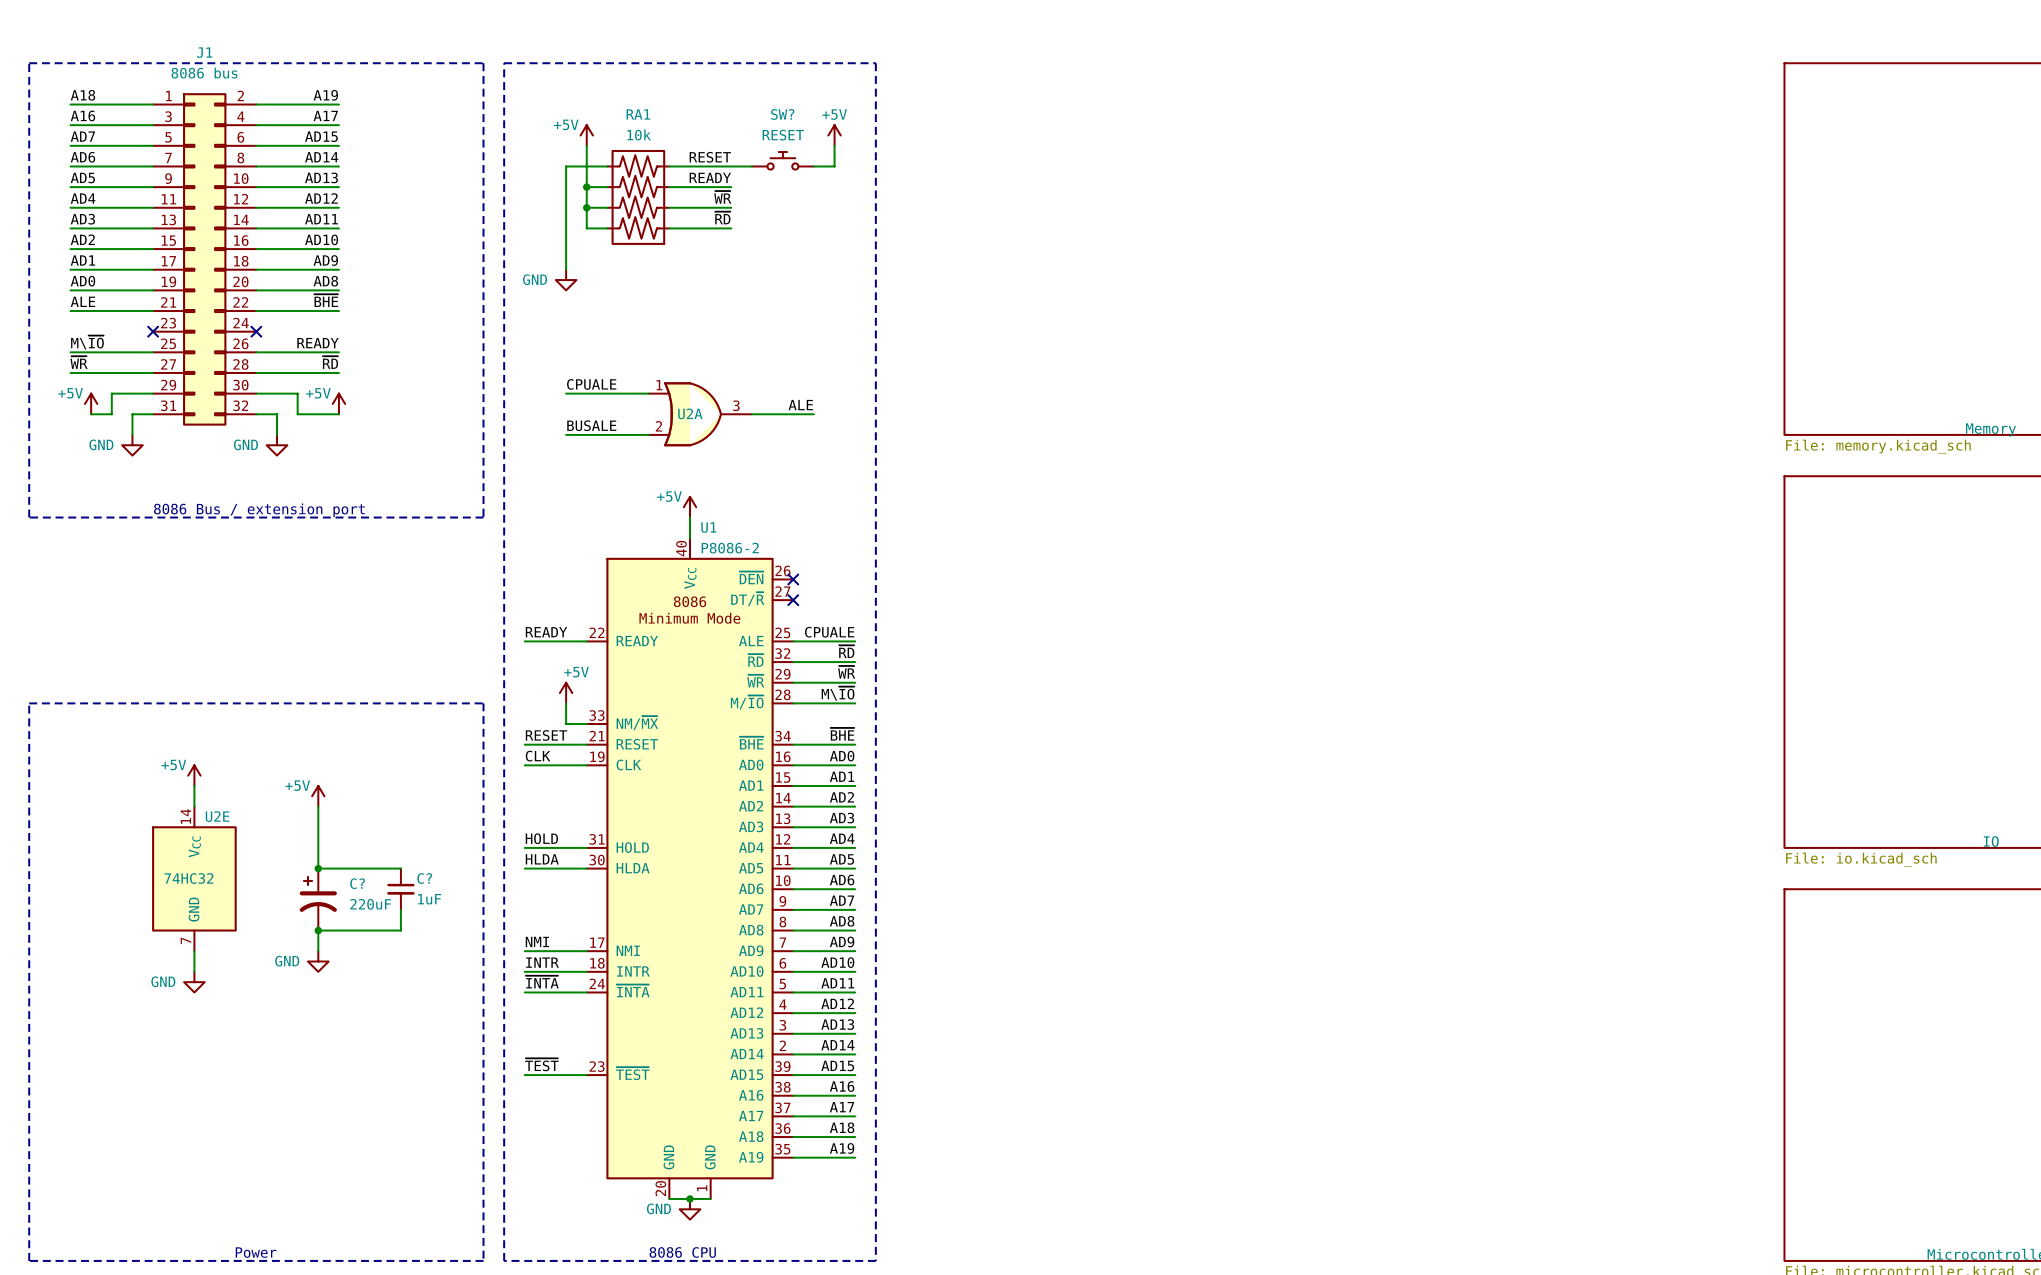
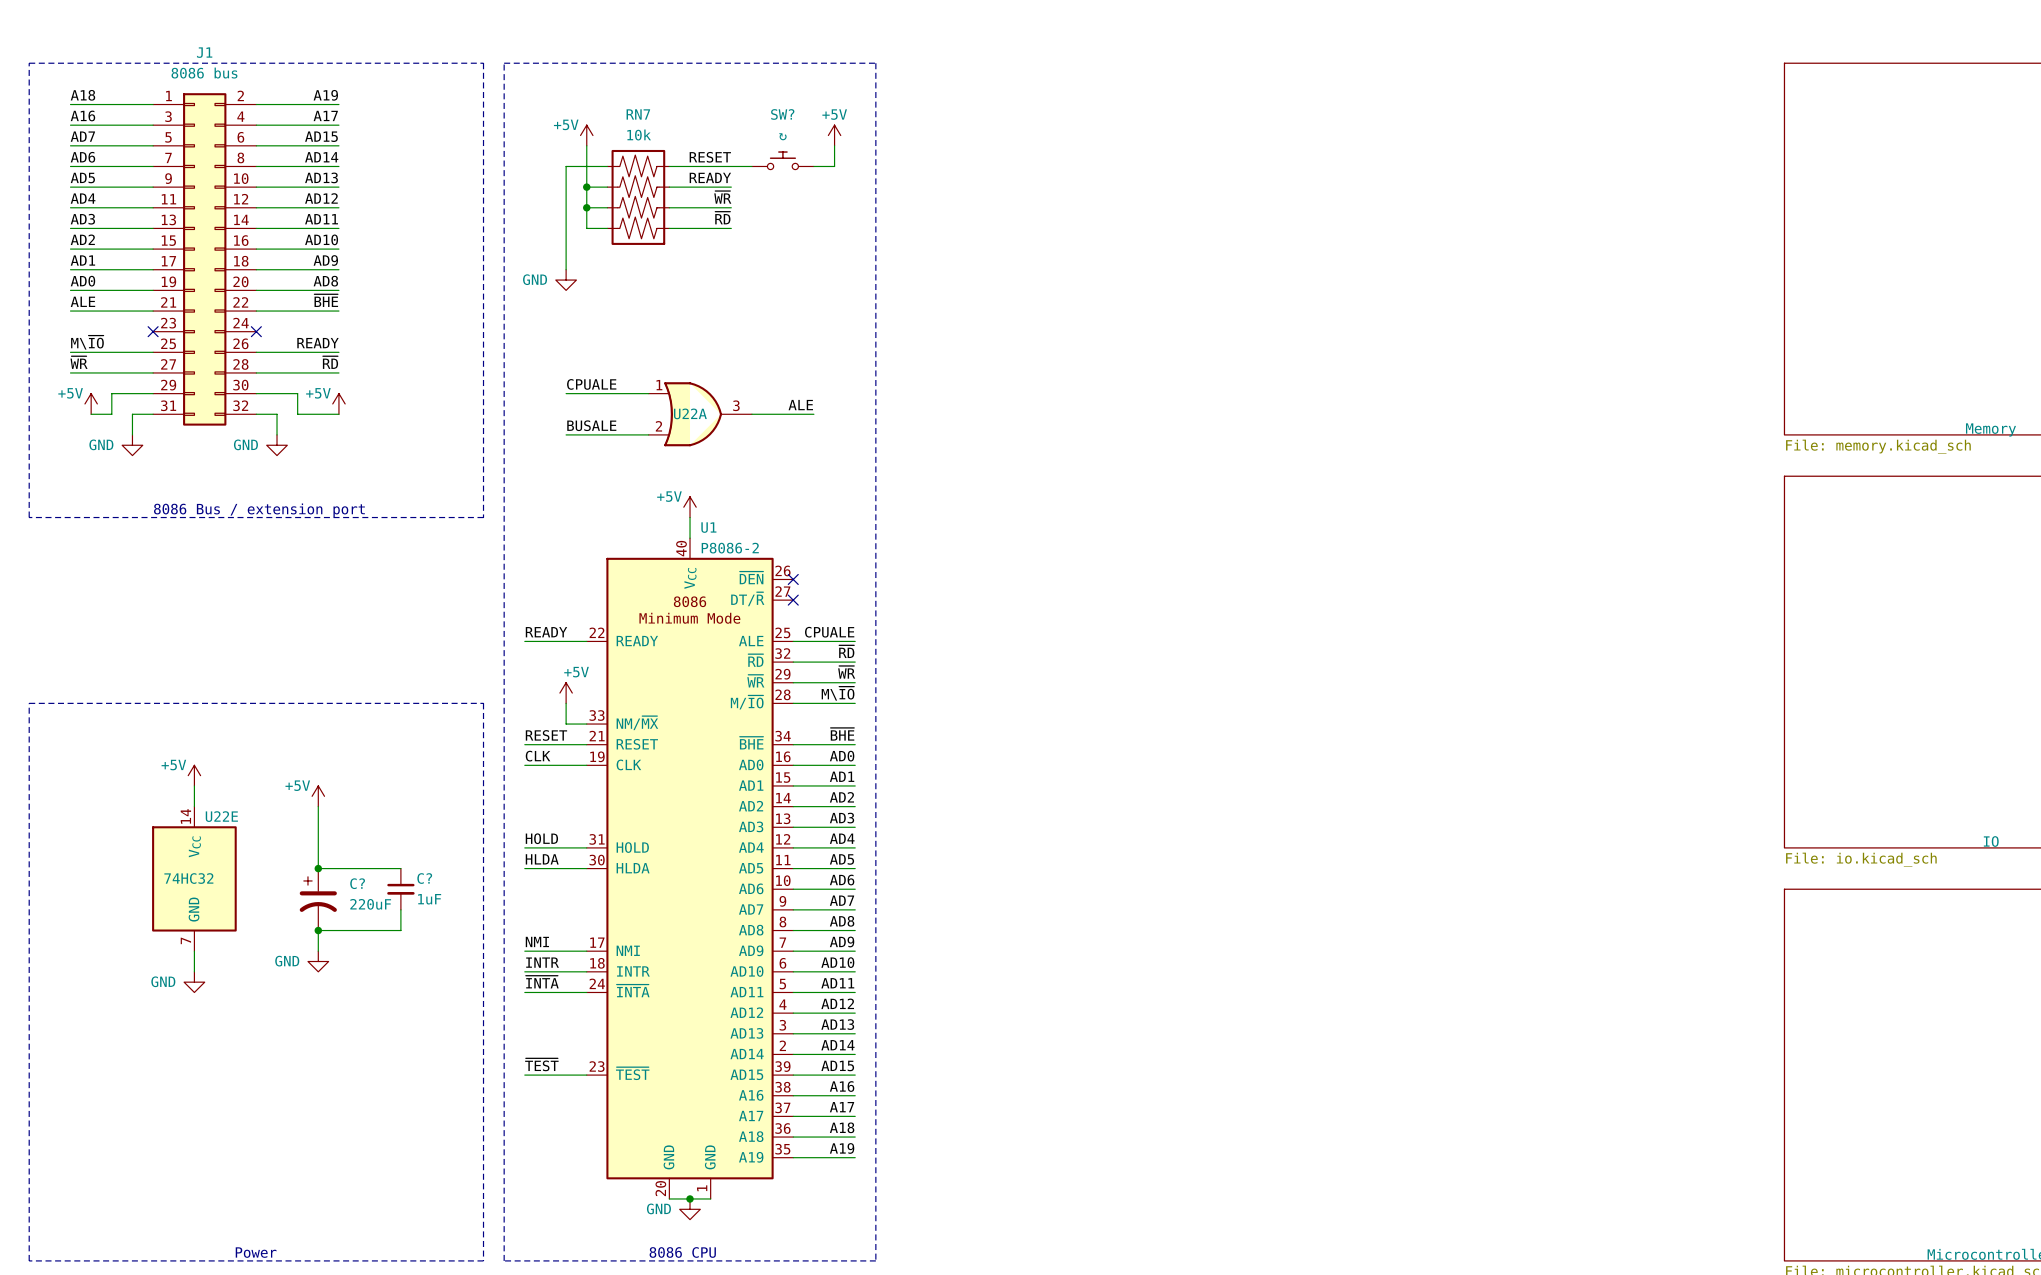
RA1 name: RA1 (638, 114) -> RN7 (638, 114)
SW? value: RESET (783, 135) -> none
SW? text: none -> ↻ (782, 136)
U2A name: U2A (690, 413) -> U22A (690, 413)
U2E name: U2E (217, 816) -> U22E (221, 816)

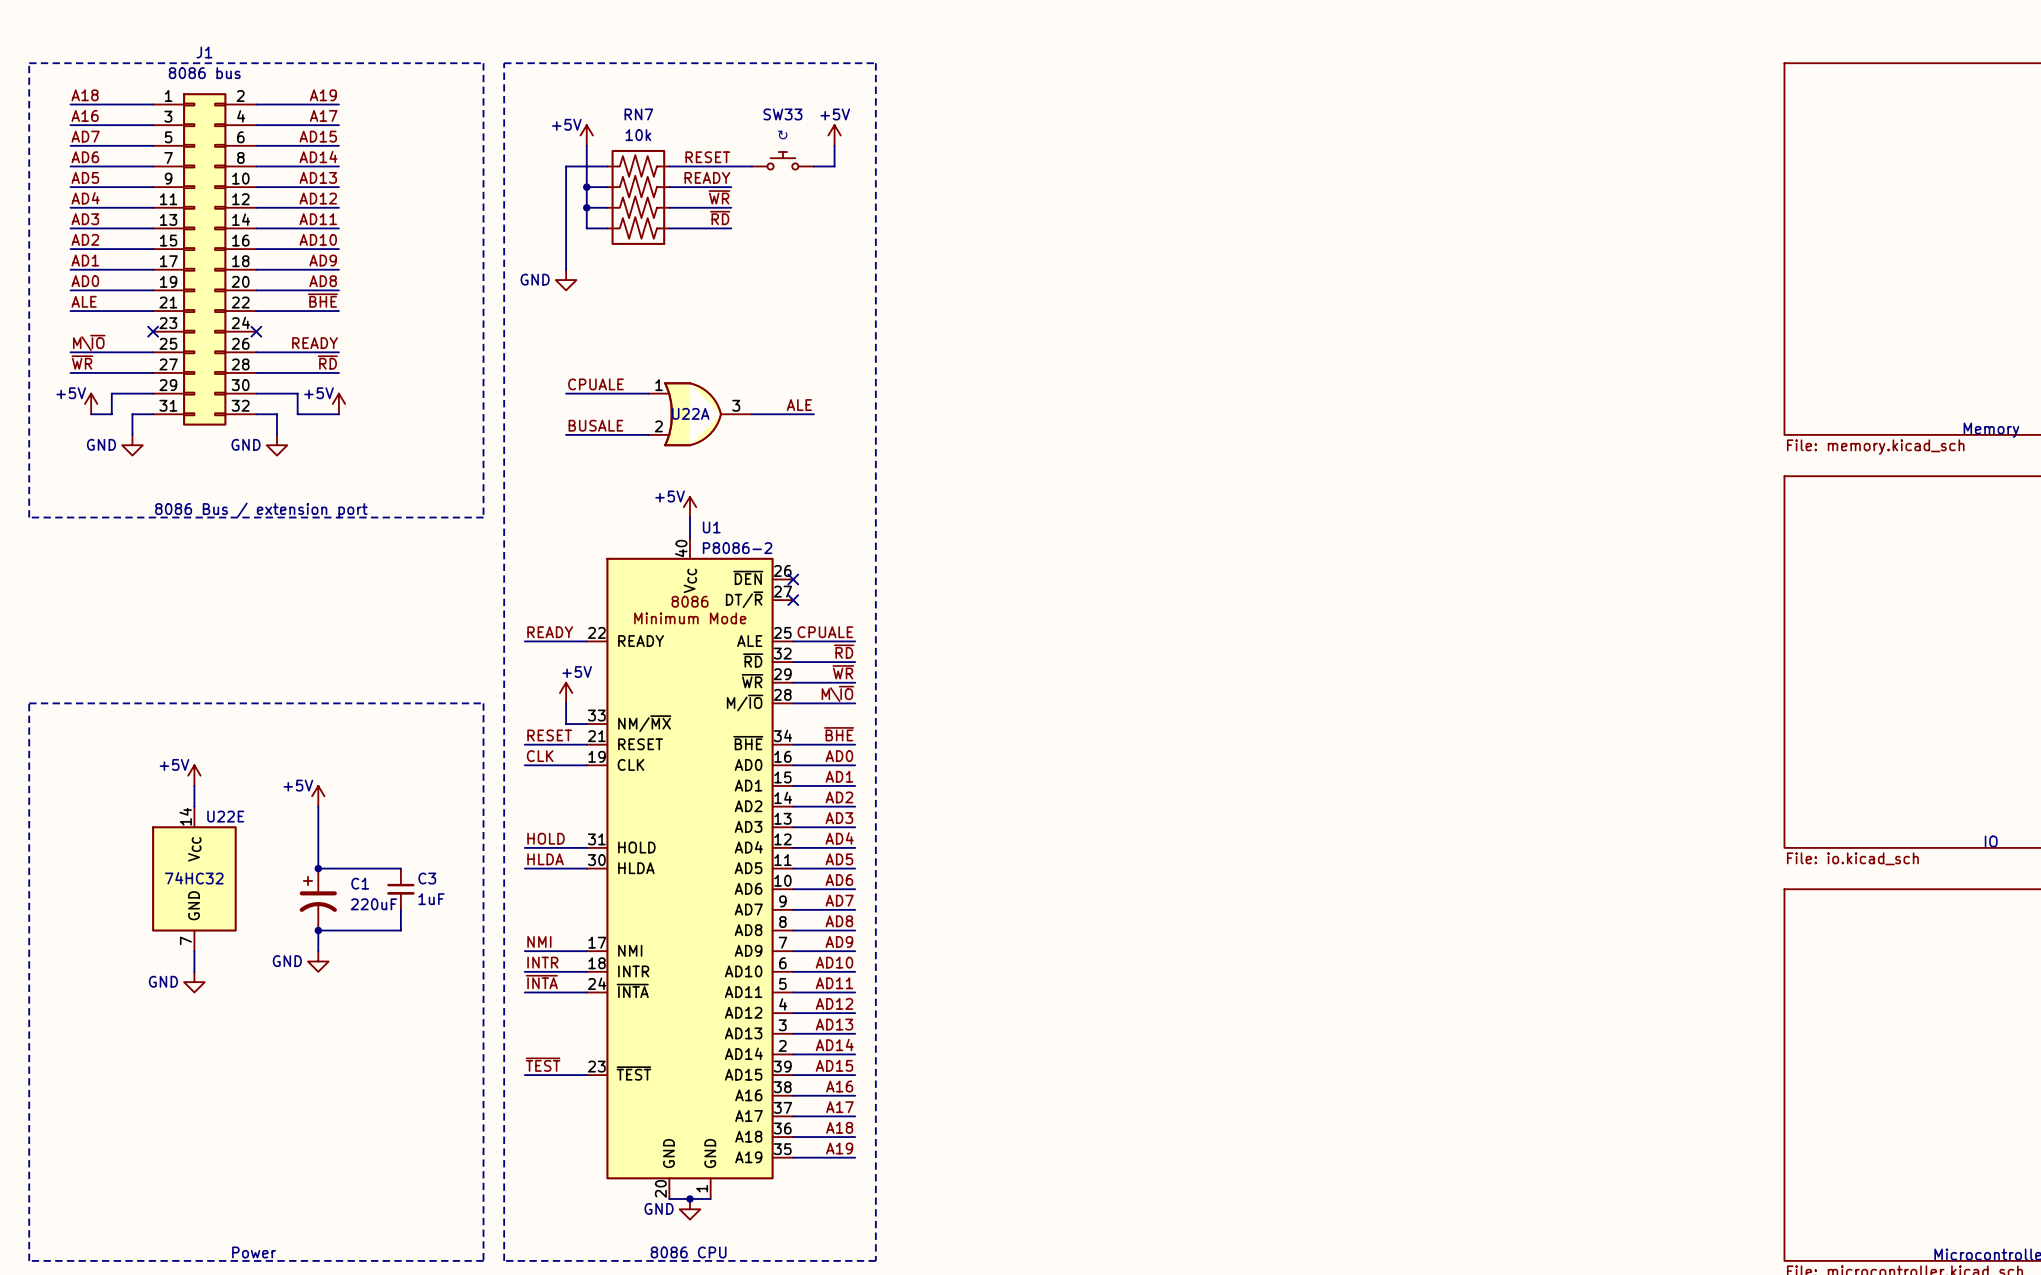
SW? name: SW? (782, 114) -> SW33 (782, 114)
C? name: C? (424, 878) -> C3 (427, 878)
C? name: C? (357, 883) -> C1 (360, 883)

